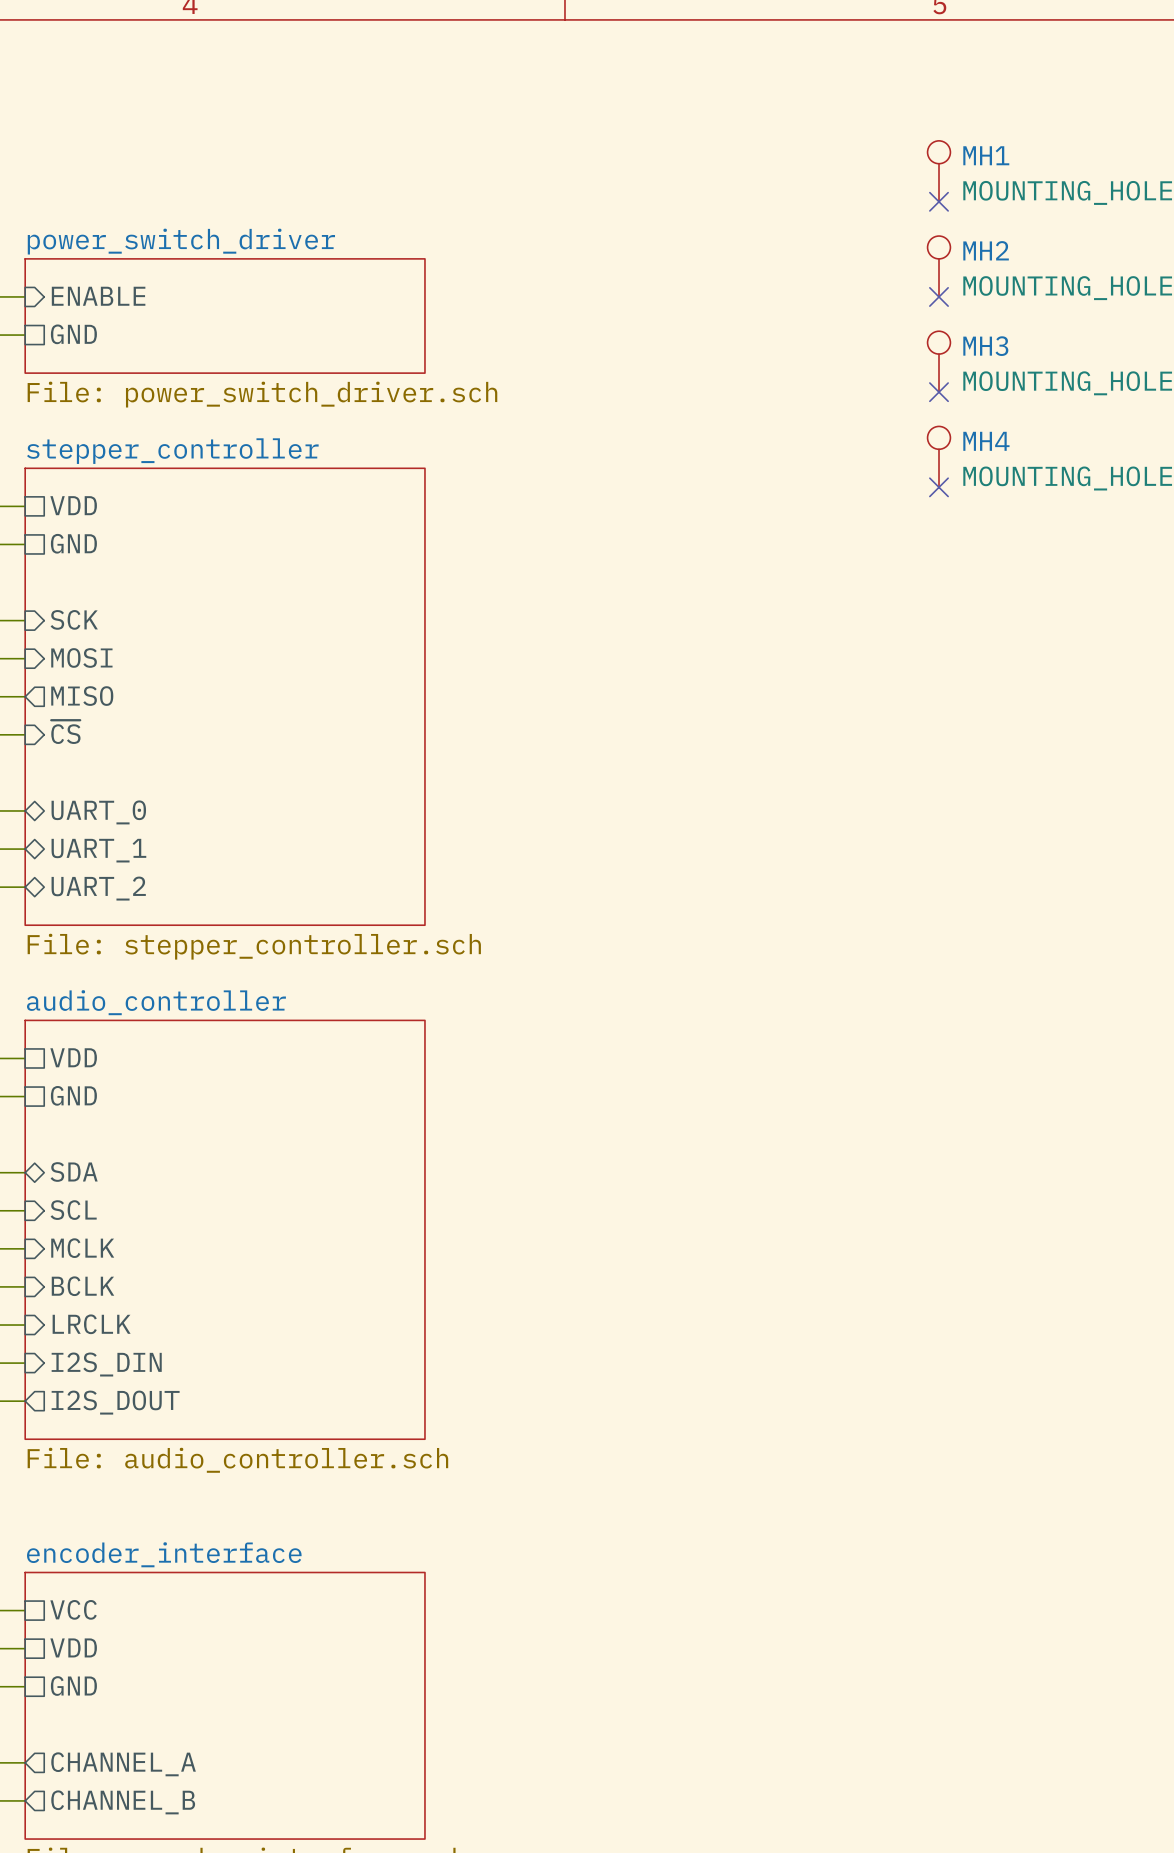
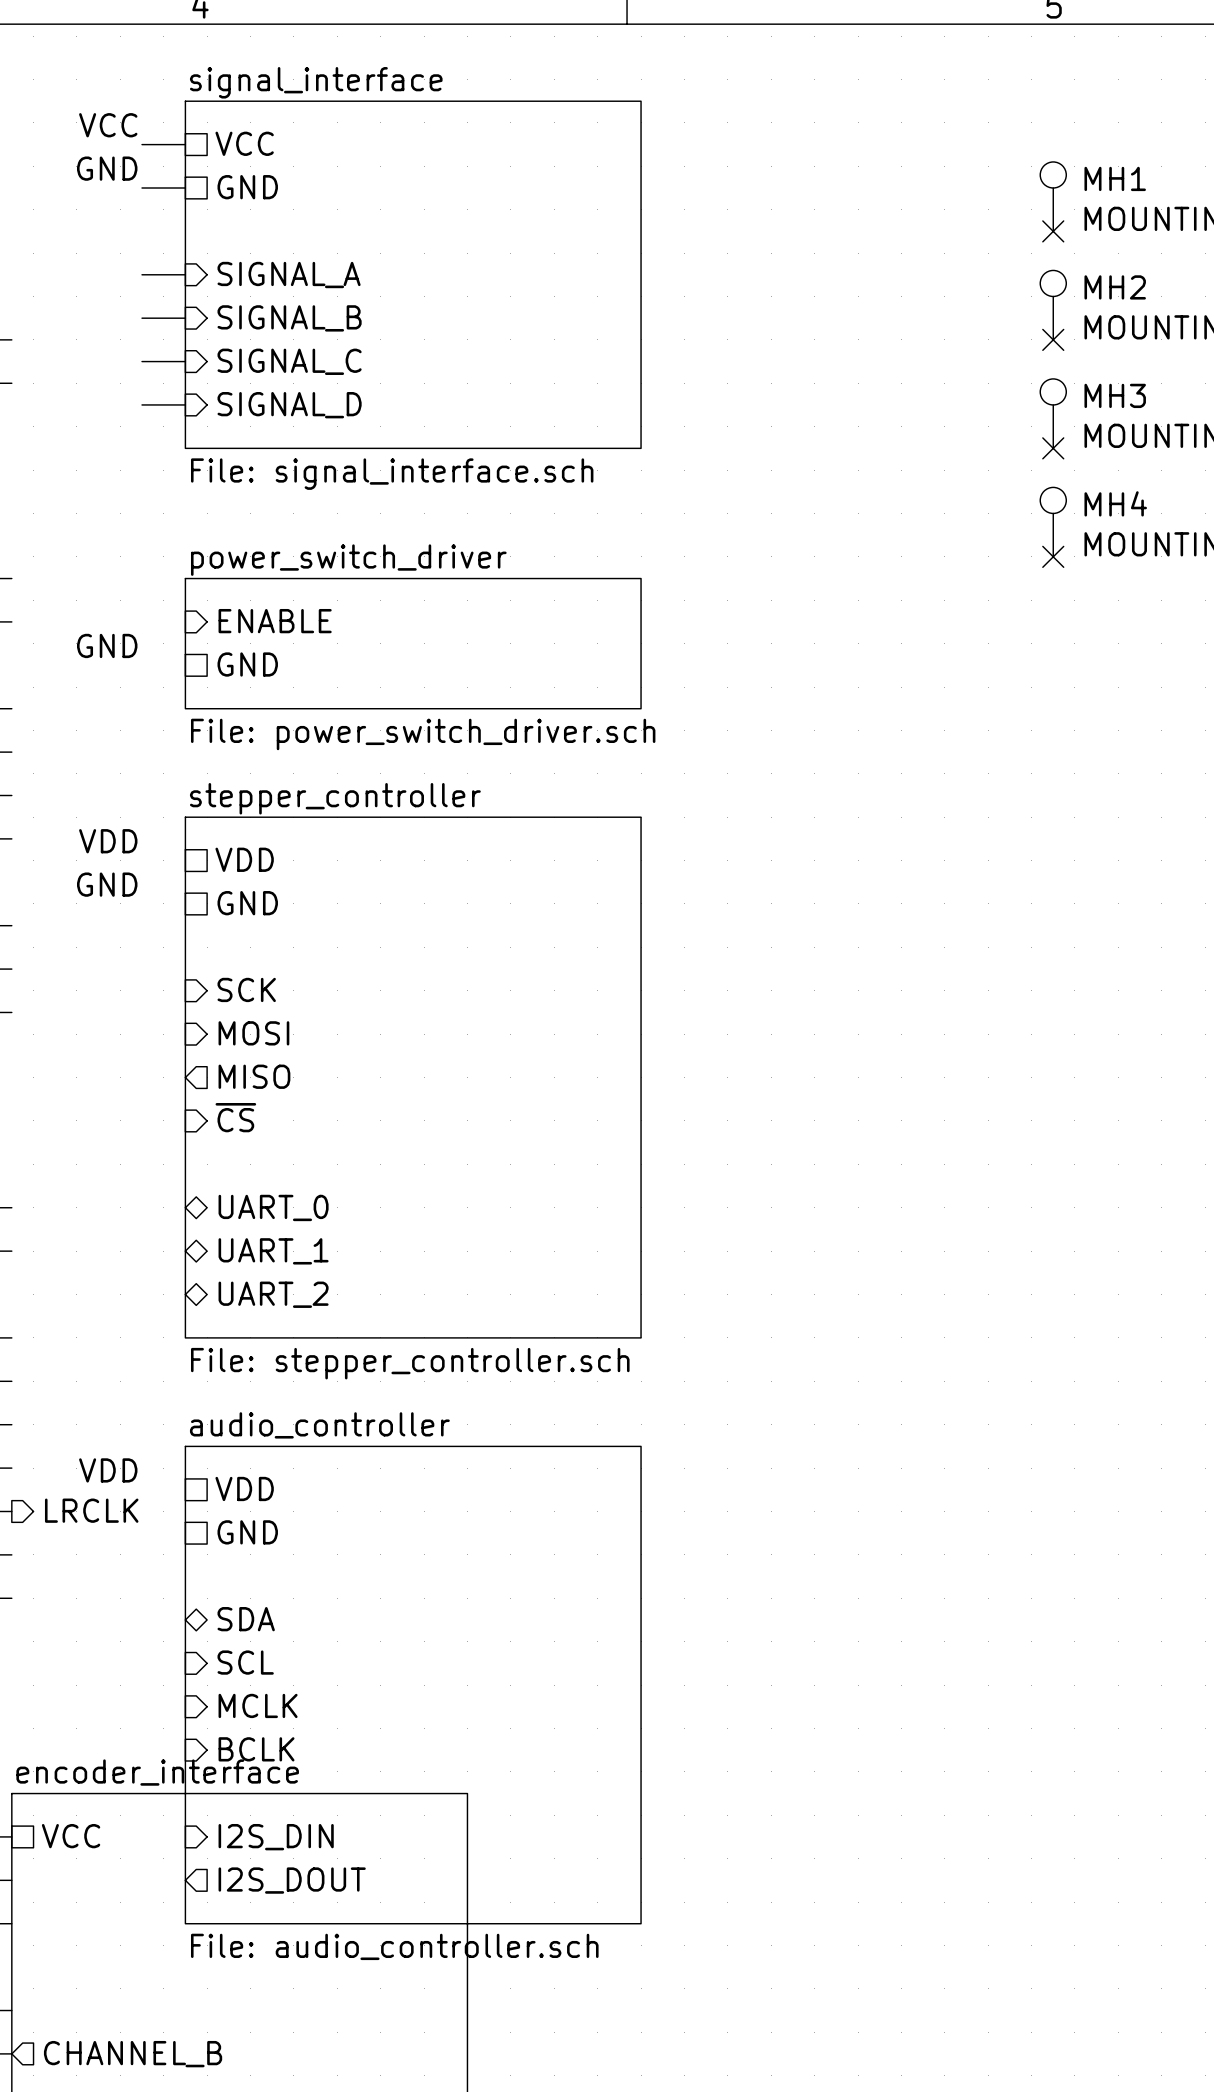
label: none -> VCC (108, 125)
sheet pin: none -> VCC (244, 143)
wire: none -> (142, 144) (185, 144)
label: none -> GND (107, 168)
sheet pin: none -> GND (247, 187)
wire: none -> (142, 188) (185, 188)
wire: none -> (142, 274) (185, 274)
sheet signal_interface: none -> File: signal_interface.sch (413, 274)
sheet pin: none -> SIGNAL_A (289, 275)
wire: none -> (142, 318) (185, 318)
sheet pin: none -> SIGNAL_B (289, 318)
sheet pin position: ENABLE (98, 296) -> ENABLE (275, 621)
wire: none -> (142, 361) (185, 361)
sheet power_switch_driver position: (225, 316) -> (413, 643)
sheet pin: none -> SIGNAL_C (289, 361)
sheet pin: GND (73, 334) -> none
wire: none -> (142, 404) (185, 404)
sheet pin: none -> SIGNAL_D (289, 405)
sheet pin: VDD (73, 505) -> none
sheet pin: GND (73, 543) -> none
label: none -> GND (107, 645)
sheet pin: none -> GND (247, 664)
sheet pin position: SCK (74, 619) -> SCK (246, 989)
sheet pin position: MOSI (81, 657) -> MOSI (253, 1033)
sheet pin position: MISO (82, 696) -> MISO (254, 1076)
sheet stepper_controller position: (225, 696) -> (413, 1077)
sheet pin position: ~{CS} (65, 732) -> ~{CS} (235, 1117)
label: none -> VDD (108, 841)
sheet pin: none -> VDD (244, 859)
label: none -> GND (107, 884)
sheet pin: none -> GND (247, 903)
sheet pin position: UART_0 (98, 812) -> UART_0 (273, 1207)
sheet pin position: UART_1 (98, 850) -> UART_1 (273, 1251)
sheet pin position: UART_2 (98, 888) -> UART_2 (273, 1294)
sheet pin: VDD (73, 1057) -> none
sheet pin: GND (73, 1095) -> none
sheet pin position: SDA (74, 1171) -> SDA (246, 1619)
sheet pin position: SCL (73, 1210) -> SCL (245, 1662)
sheet audio_controller position: (225, 1229) -> (413, 1685)
sheet pin position: MCLK (82, 1248) -> MCLK (258, 1705)
sheet pin position: BCLK (82, 1286) -> BCLK (256, 1749)
label: none -> VDD (108, 1470)
sheet pin: none -> VDD (244, 1488)
sheet pin: none -> GND (247, 1532)
sheet pin position: I2S_DIN (106, 1364) -> I2S_DIN (276, 1837)
sheet pin position: I2S_DOUT (115, 1402) -> I2S_DOUT (292, 1880)
sheet pin: VDD (73, 1647) -> none
sheet pin: GND (73, 1686) -> none
sheet pin: CHANNEL_A (123, 1764) -> none

